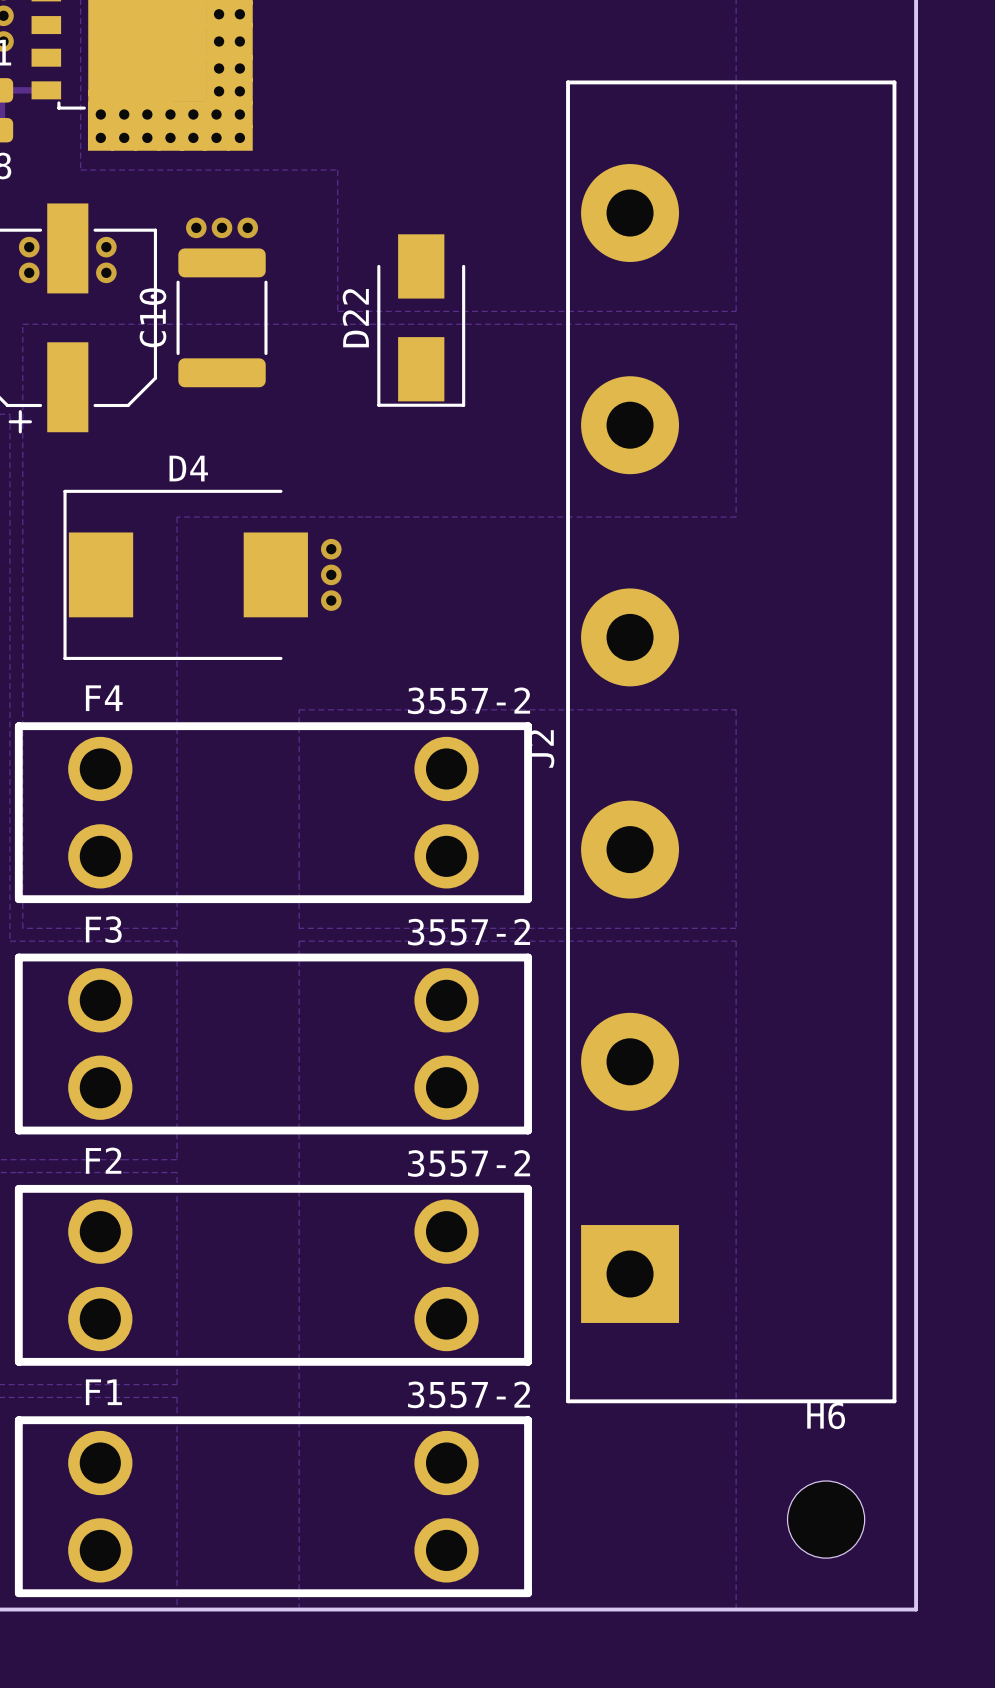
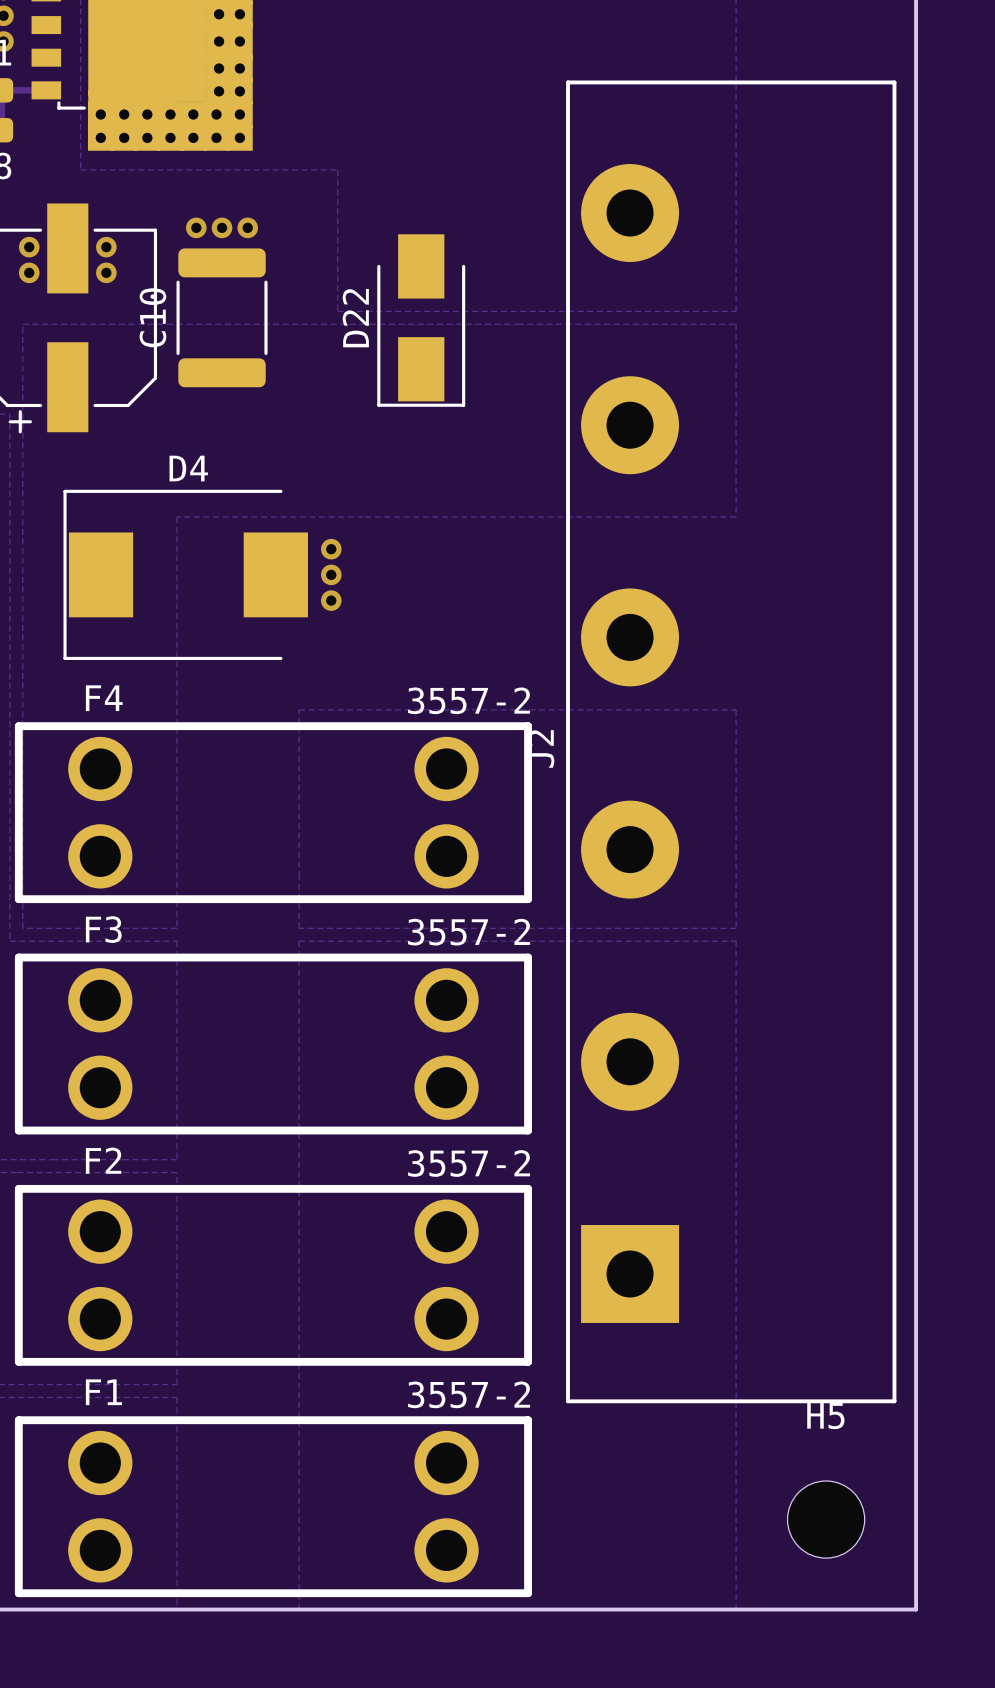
H6 name: H6 (826, 1415) -> H5 (825, 1416)

